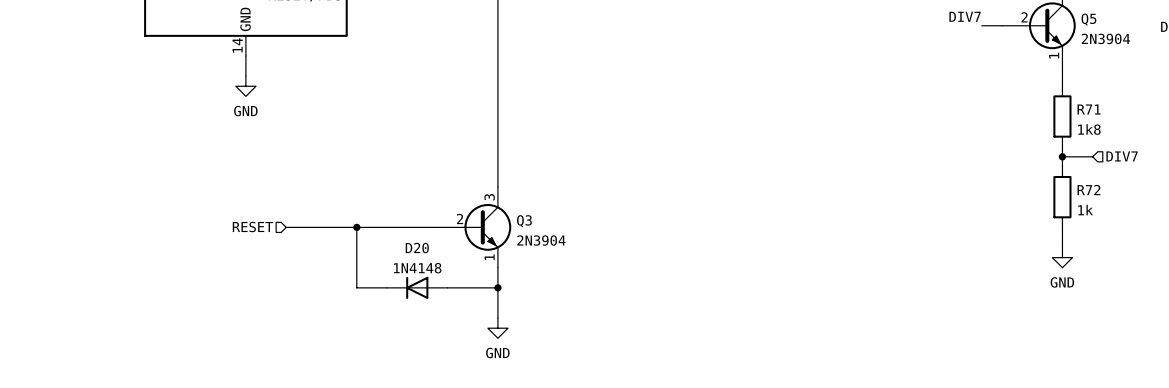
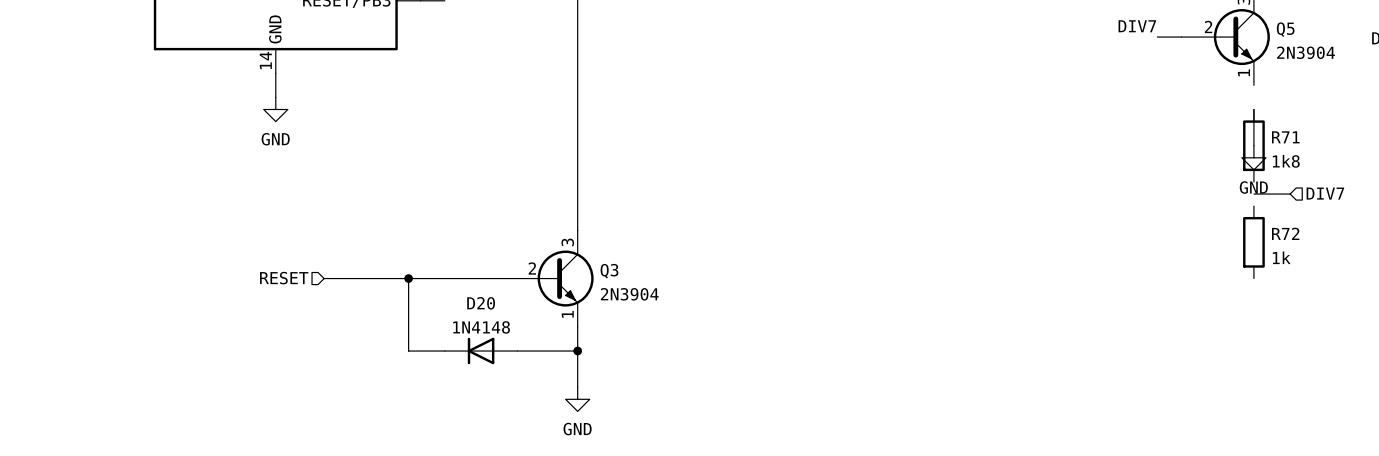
wire: (1062, 66) (1062, 86) -> (1253, 145) (1253, 109)
power symbol: none -> GND (1253, 157)
wire: (1062, 146) (1062, 166) -> none
junction: (1062, 156) -> none
wire: (1062, 227) (1062, 247) -> none
power symbol: GND (1062, 257) -> none

